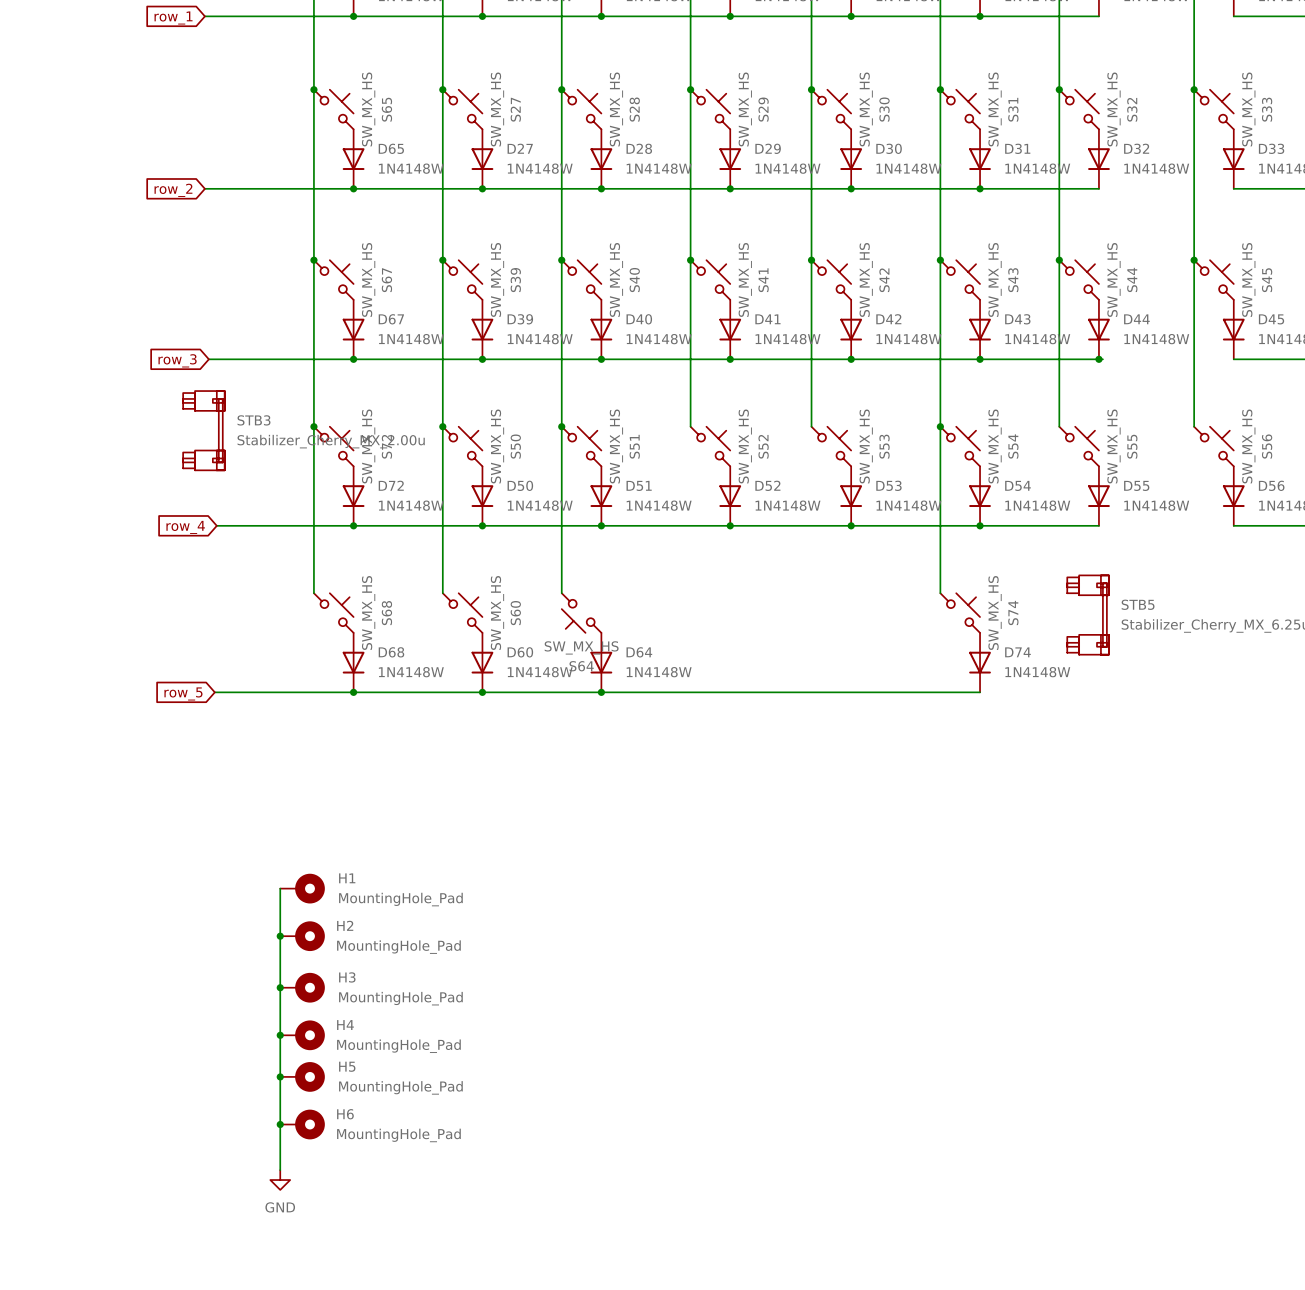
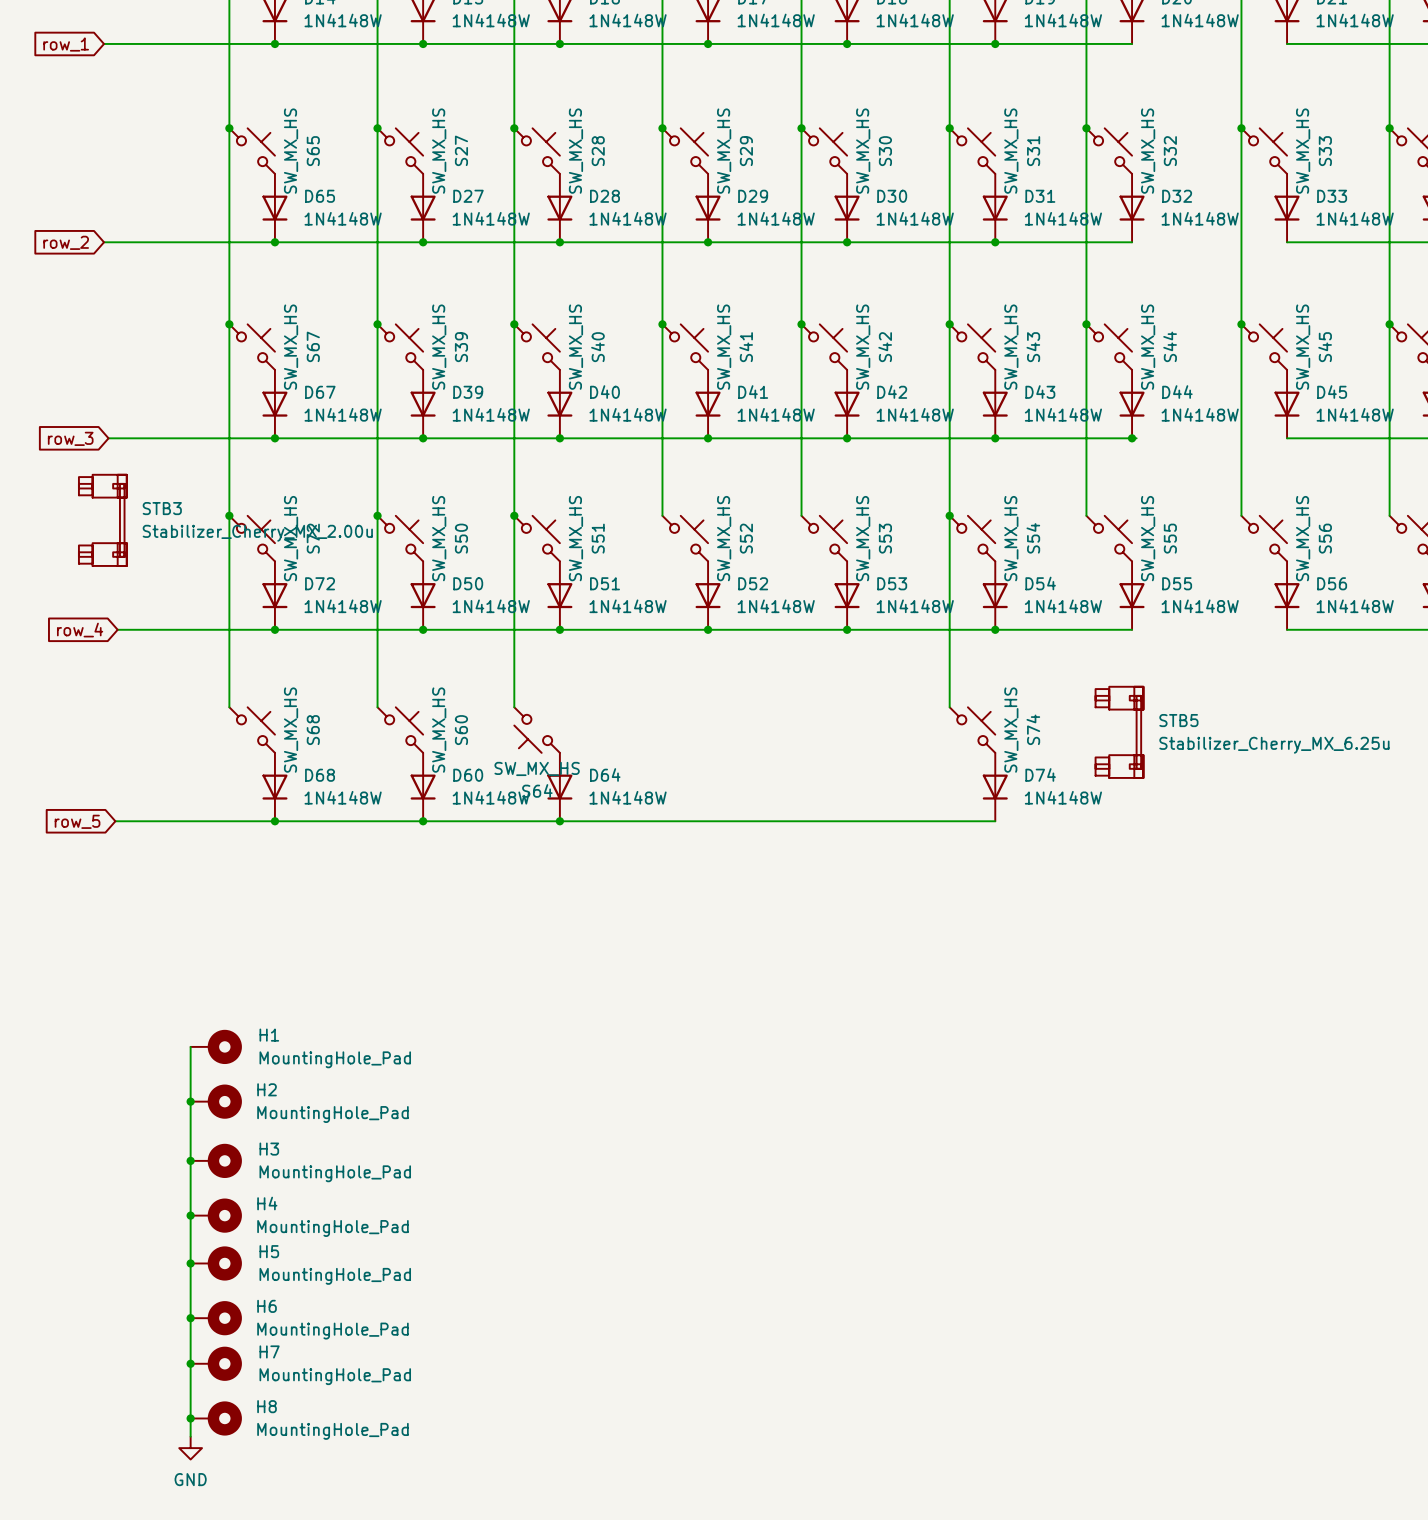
junction: none -> (190, 1363)
H7: none -> MountingHole_Pad (216, 1363)
wire: none -> (190, 1370) (190, 1436)
power symbol position: GND (280, 1180) -> GND (190, 1448)
junction: none -> (190, 1418)
H8: none -> MountingHole_Pad (216, 1418)

